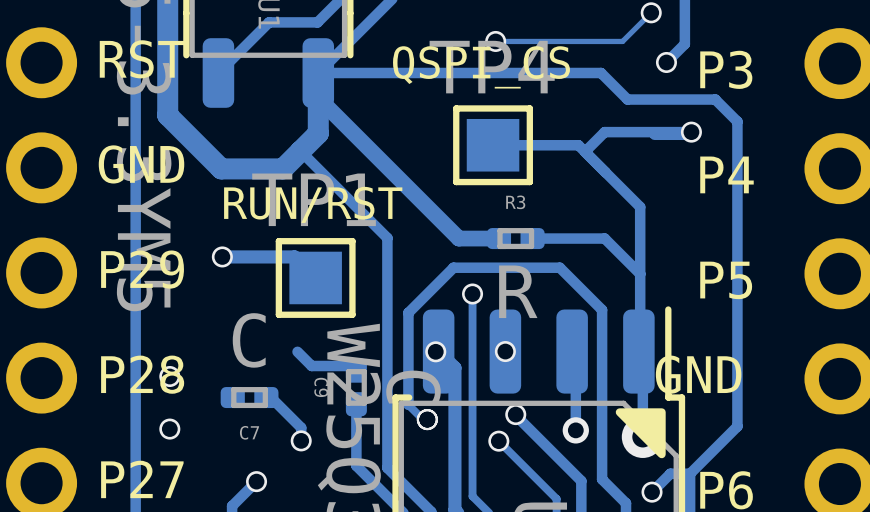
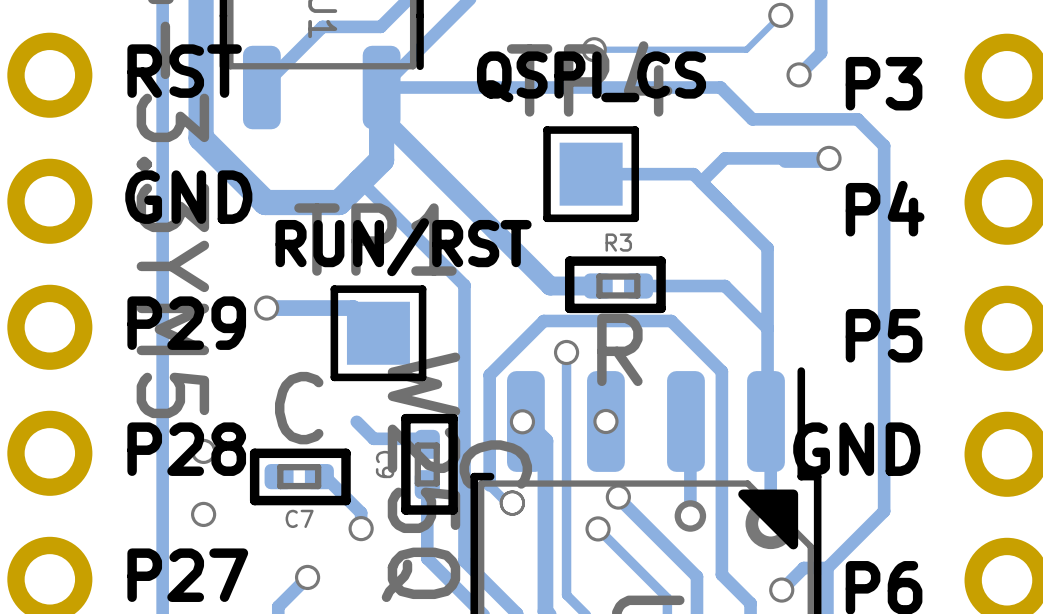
line: none -> (661, 261) (569, 261) (569, 308) (661, 308) (661, 261)
line: none -> (453, 418) (405, 418) (405, 510) (453, 510) (453, 418)
line: none -> (346, 453) (254, 453) (254, 500) (346, 500) (346, 453)

